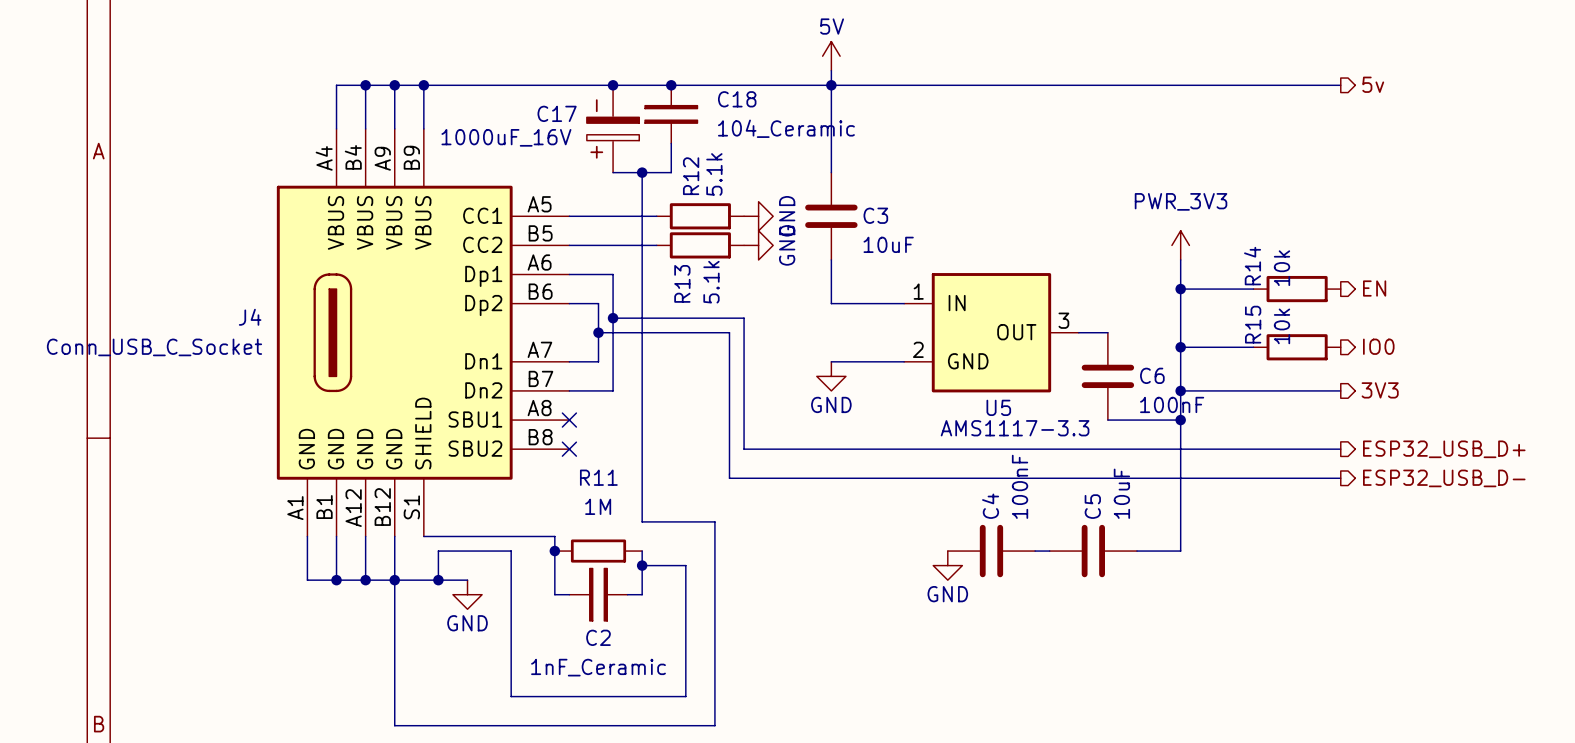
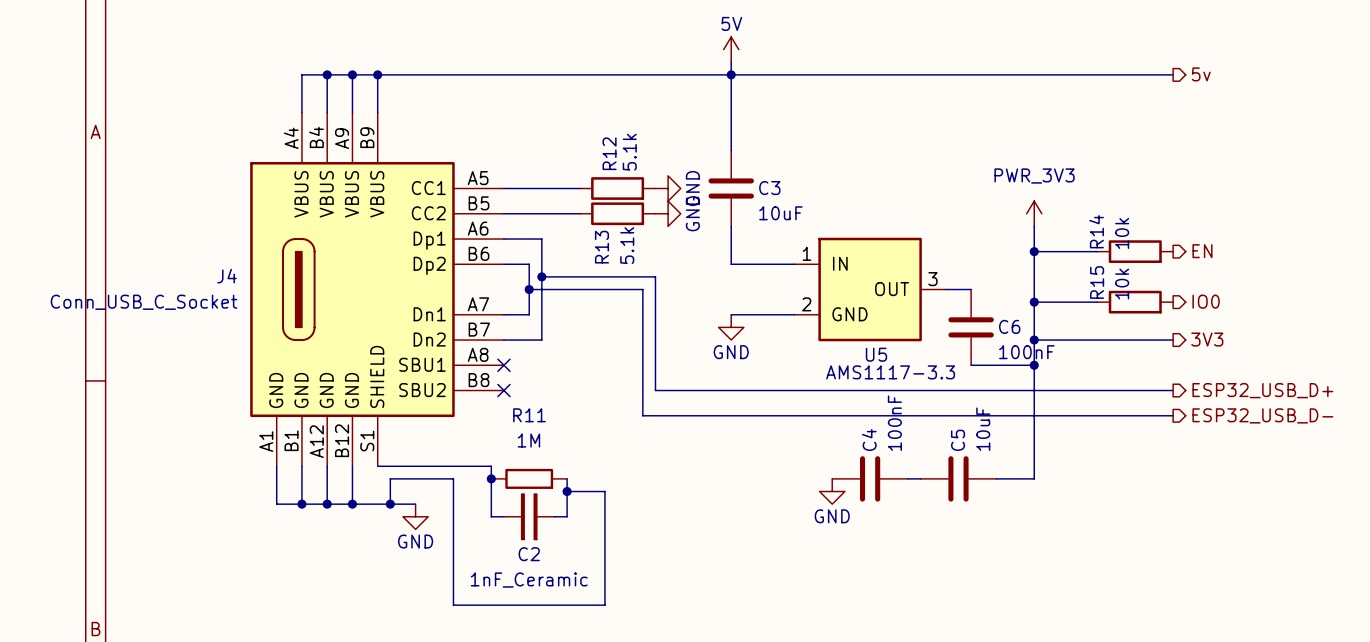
junction: (613, 85) -> none
junction: (671, 85) -> none
C18: 104_Ceramic (671, 114) -> none
C17: 1000uF_16V (613, 128) -> none
wire: (671, 143) (671, 172) (613, 172) -> none
wire: (642, 172) (642, 521) (714, 521) (714, 725) (394, 725) (394, 580) -> none
junction: (642, 172) -> none

